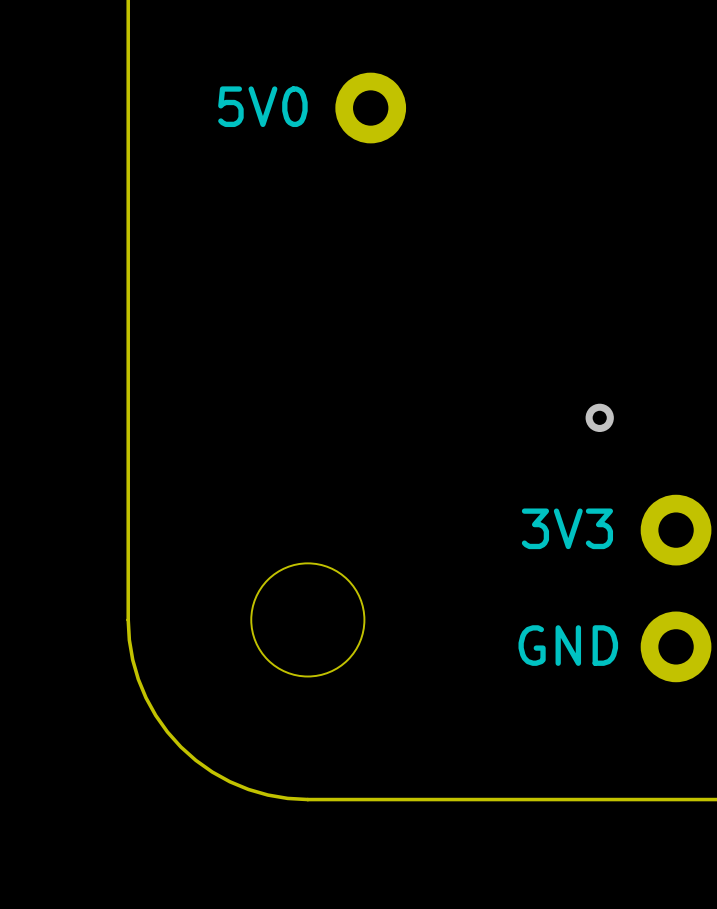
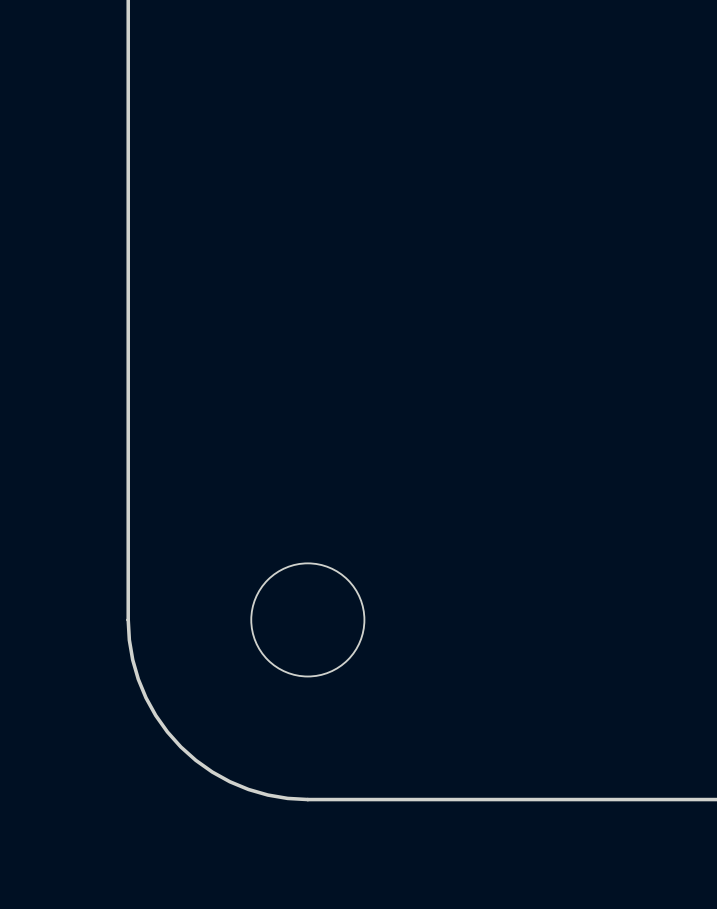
text: 5V0 (262, 106) -> none
part: (370, 108) -> none
via: (599, 417) -> none
text: 3V3 (567, 528) -> none
part: (676, 530) -> none
text: GND (568, 645) -> none
part: (676, 646) -> none

